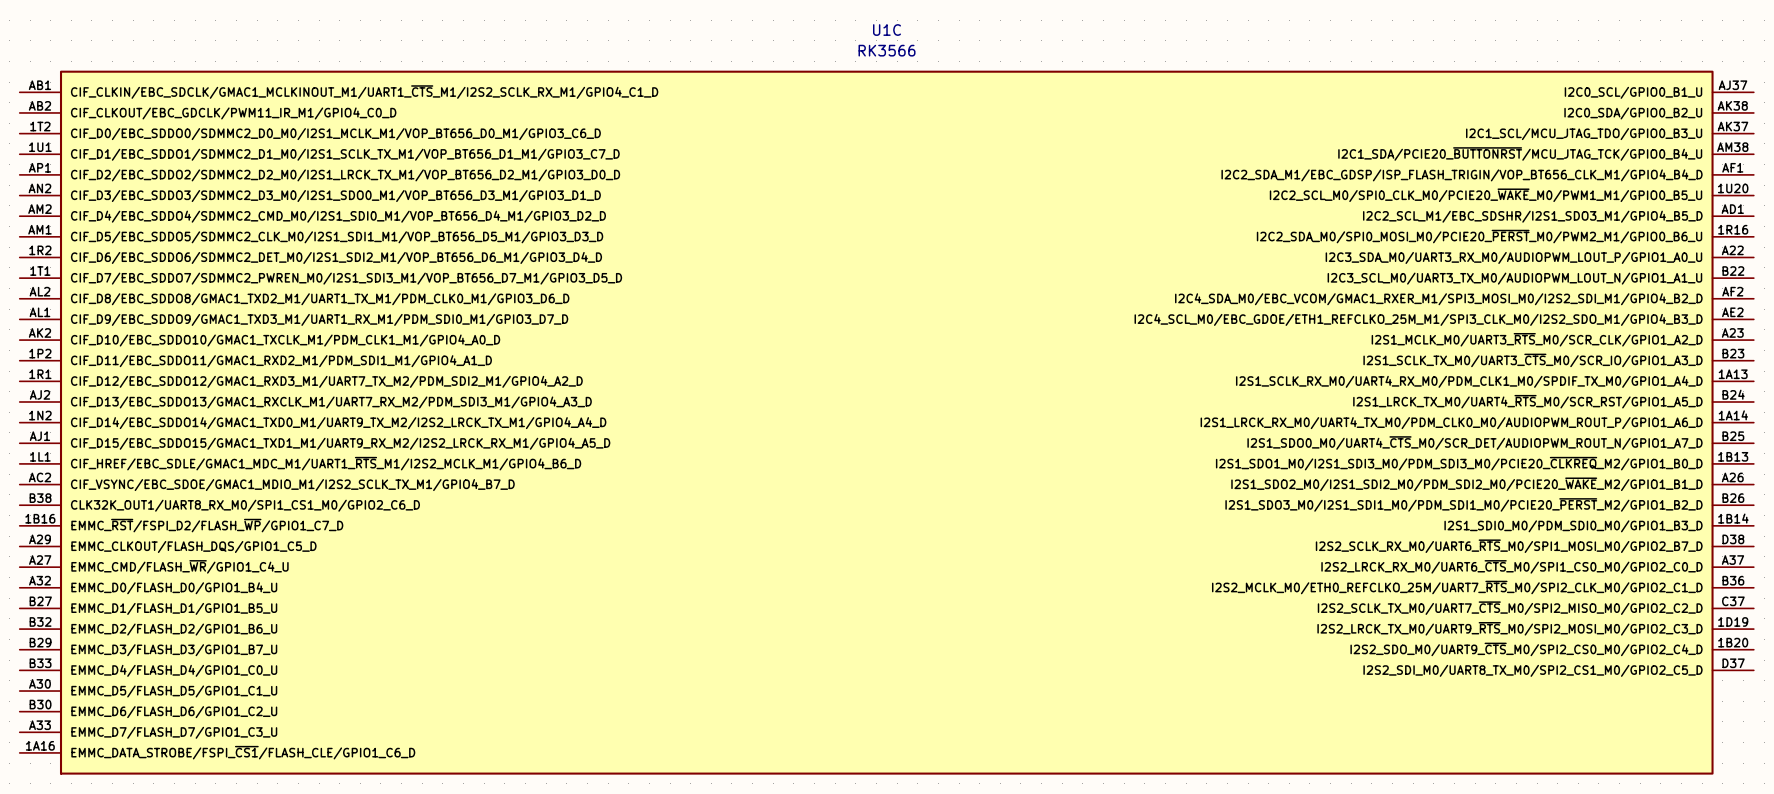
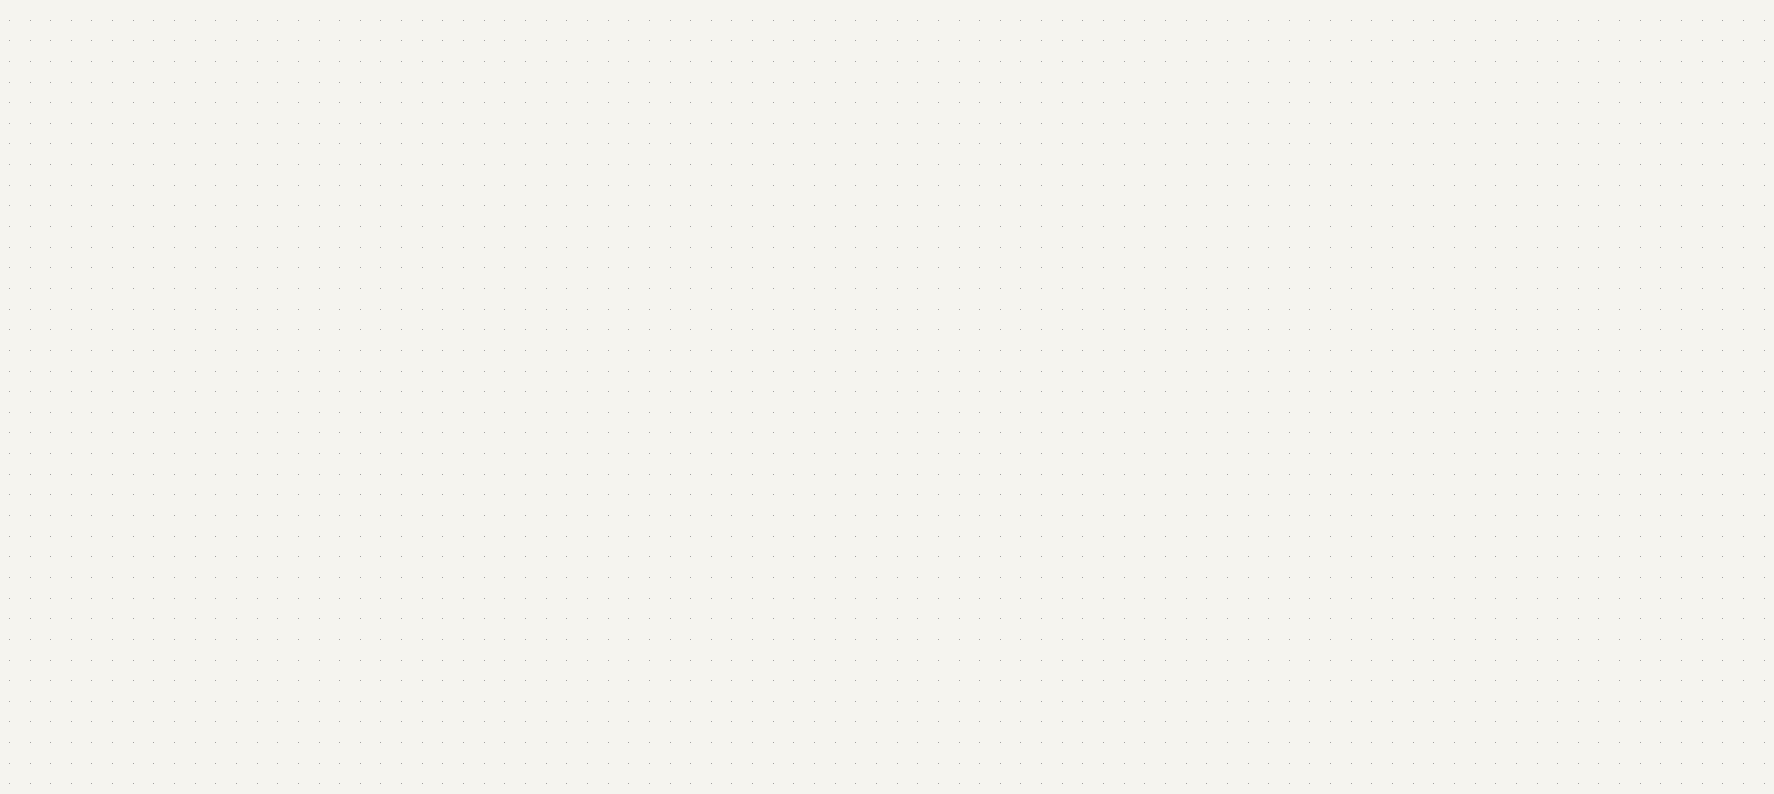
U1C: RK3566 (886, 422) -> none

